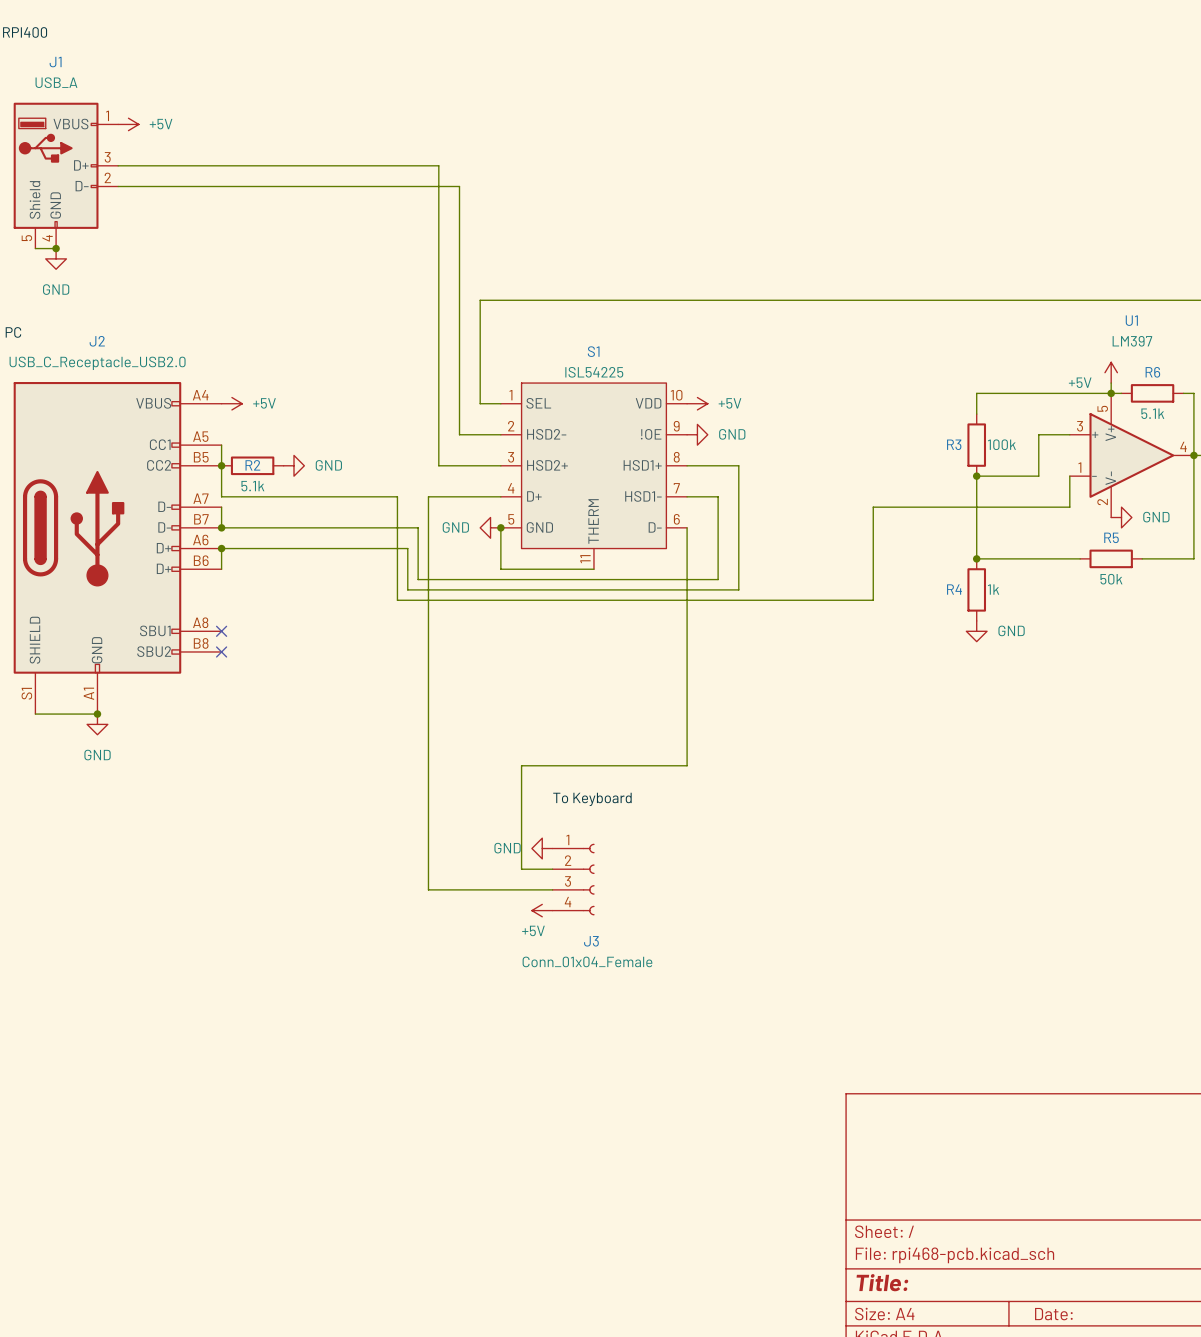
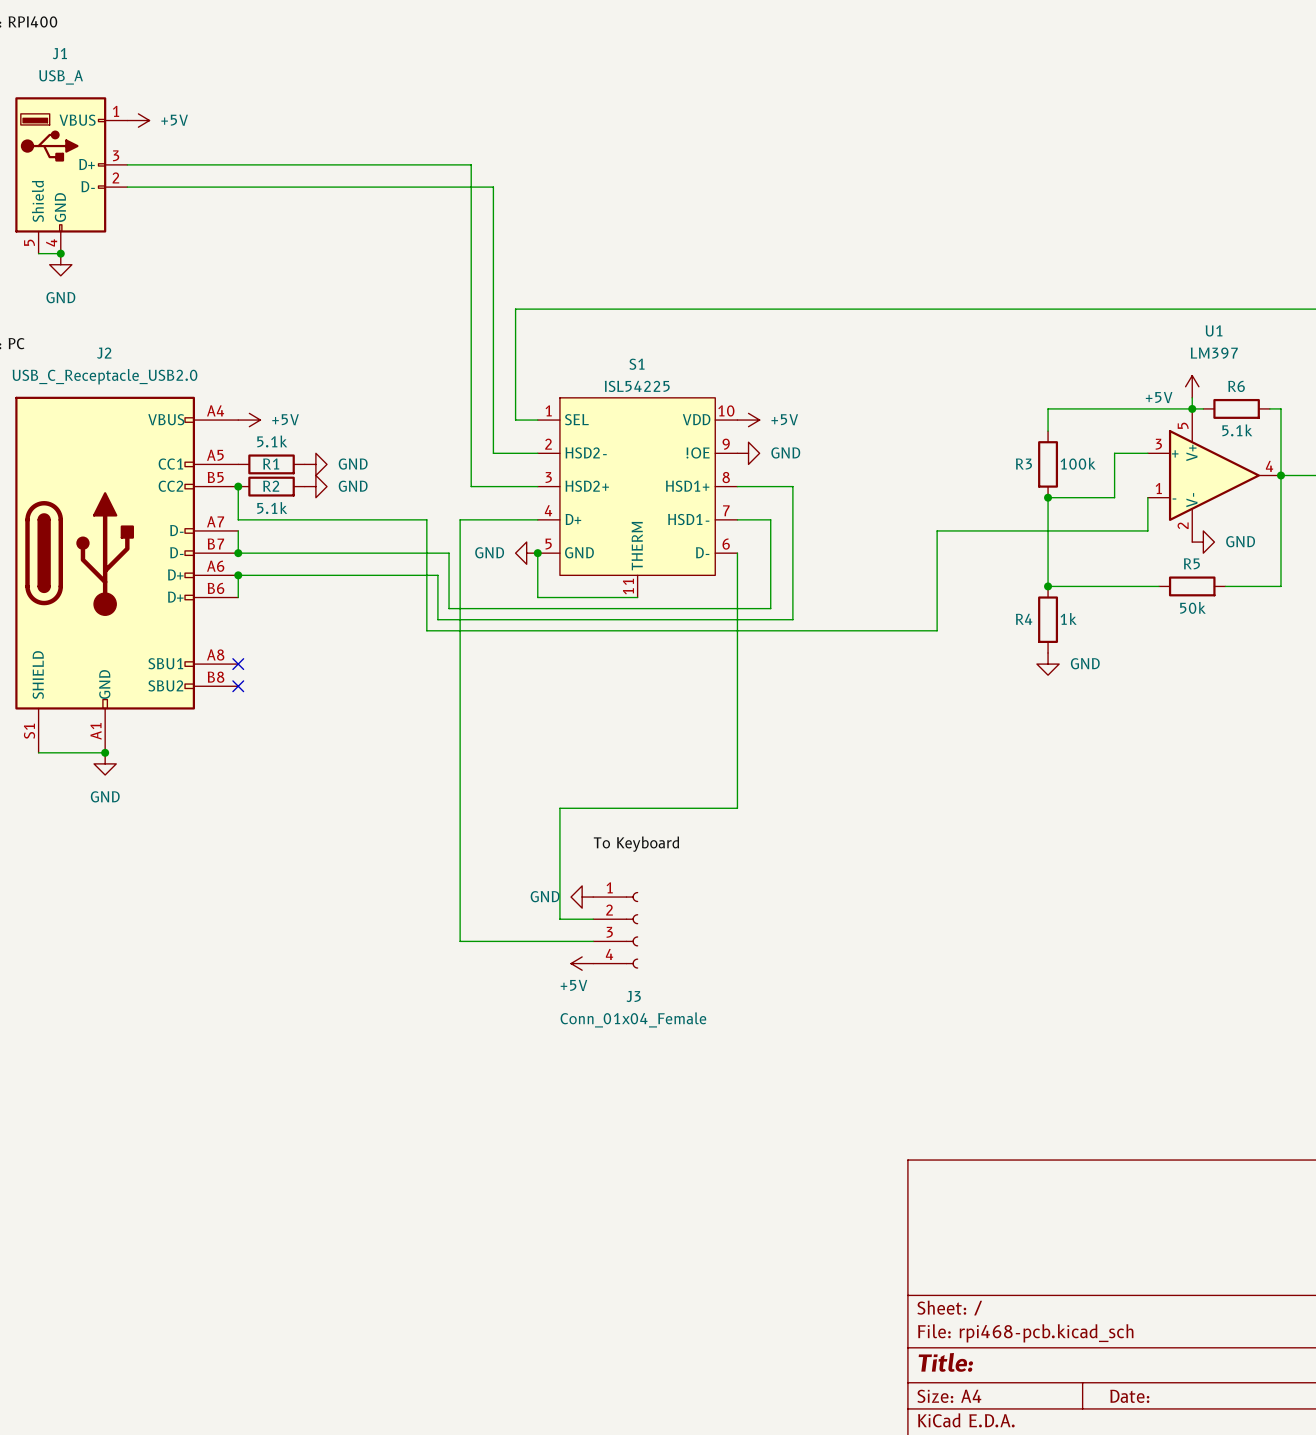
wire: (221, 445) (221, 465) -> none
R1: none -> 5.1k (271, 464)
power symbol: none -> GND (315, 464)

